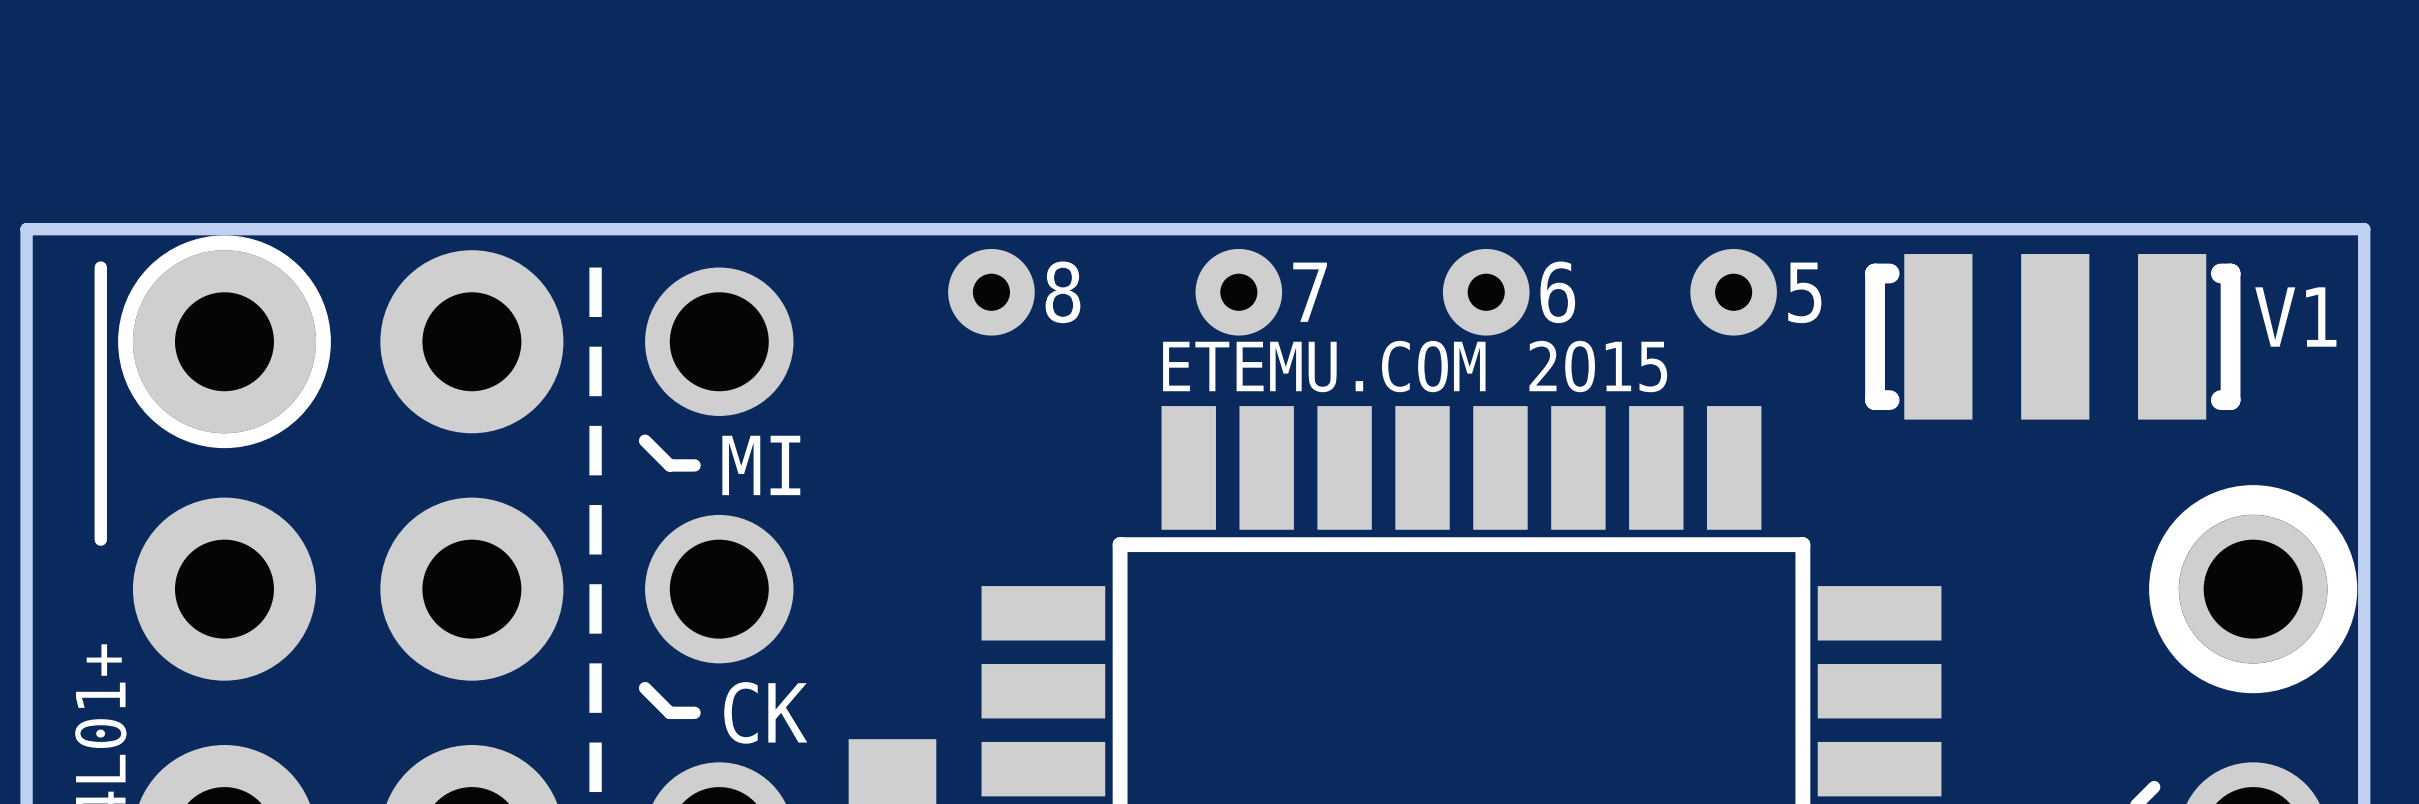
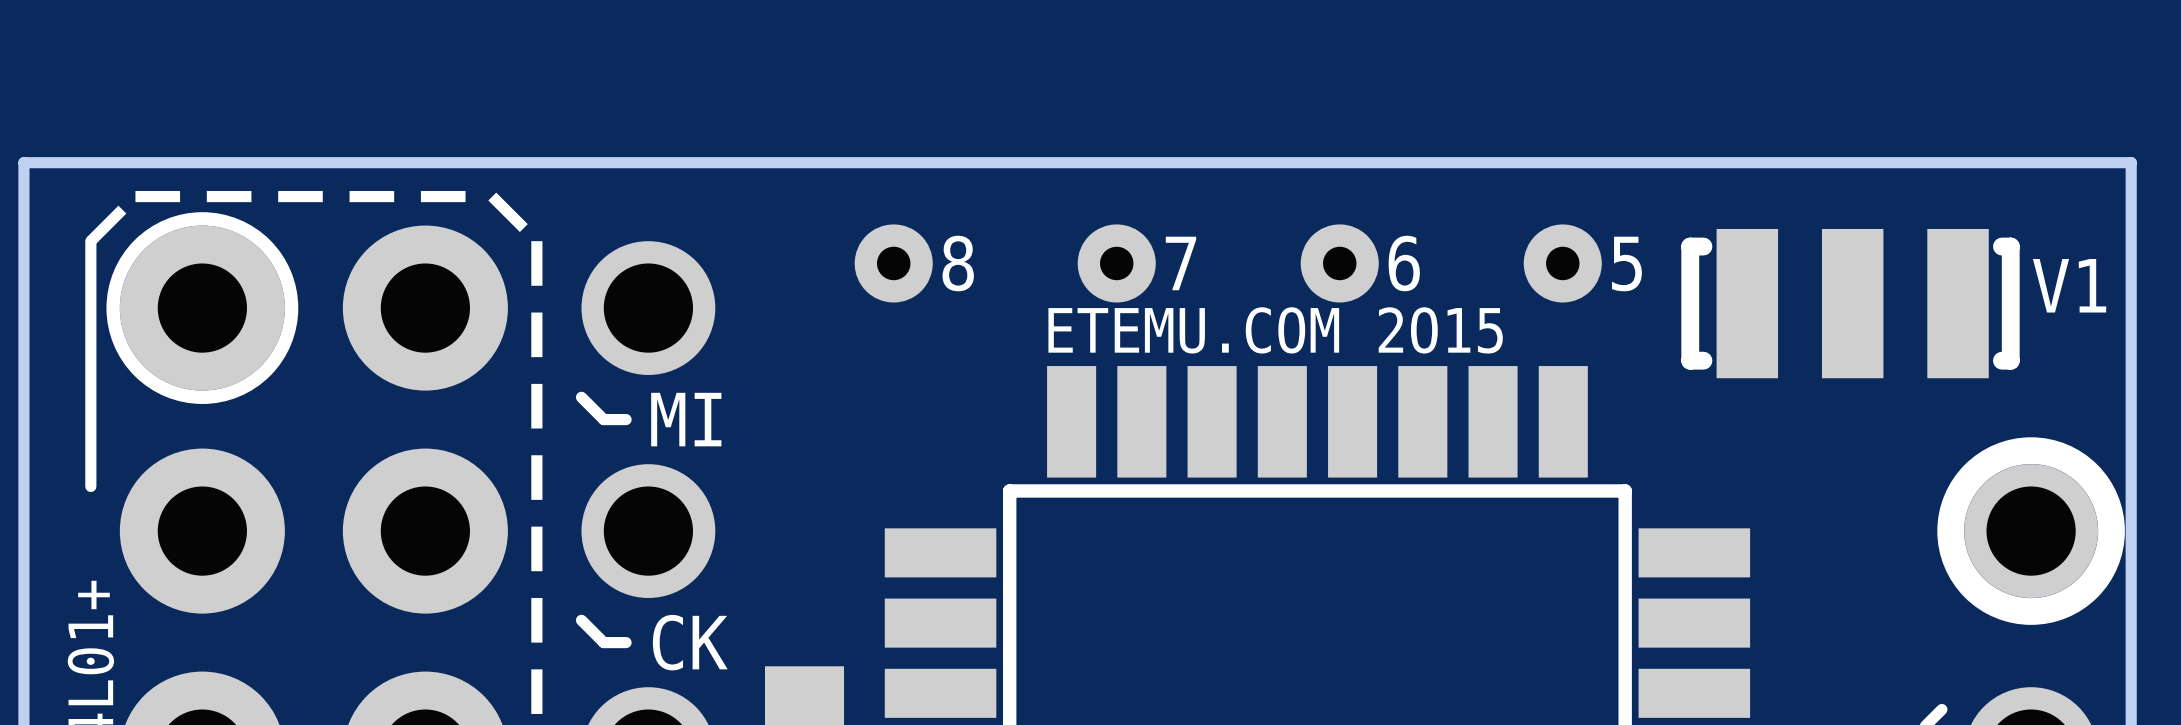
board edge: (26, 229) (2364, 229) -> (23, 206) (23, 162) (2131, 162) (2131, 206)
line: none -> (90, 241) (135, 196) (492, 196) (536, 241)

